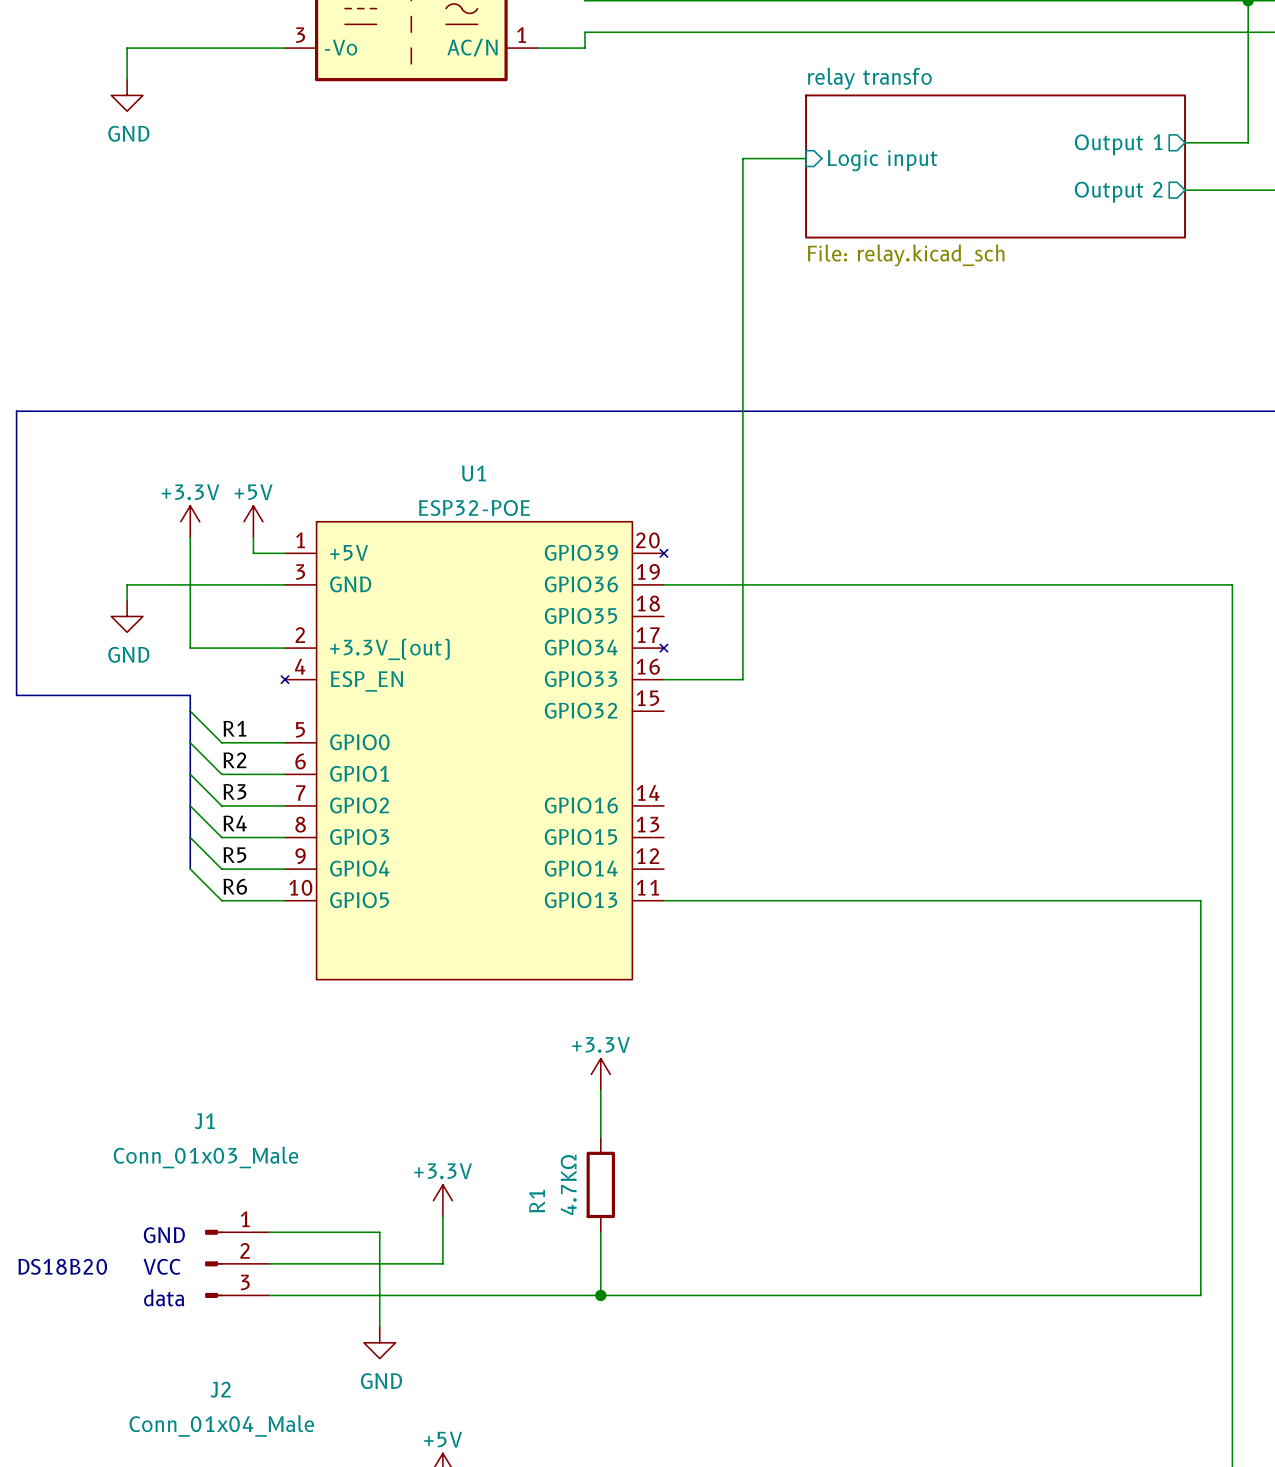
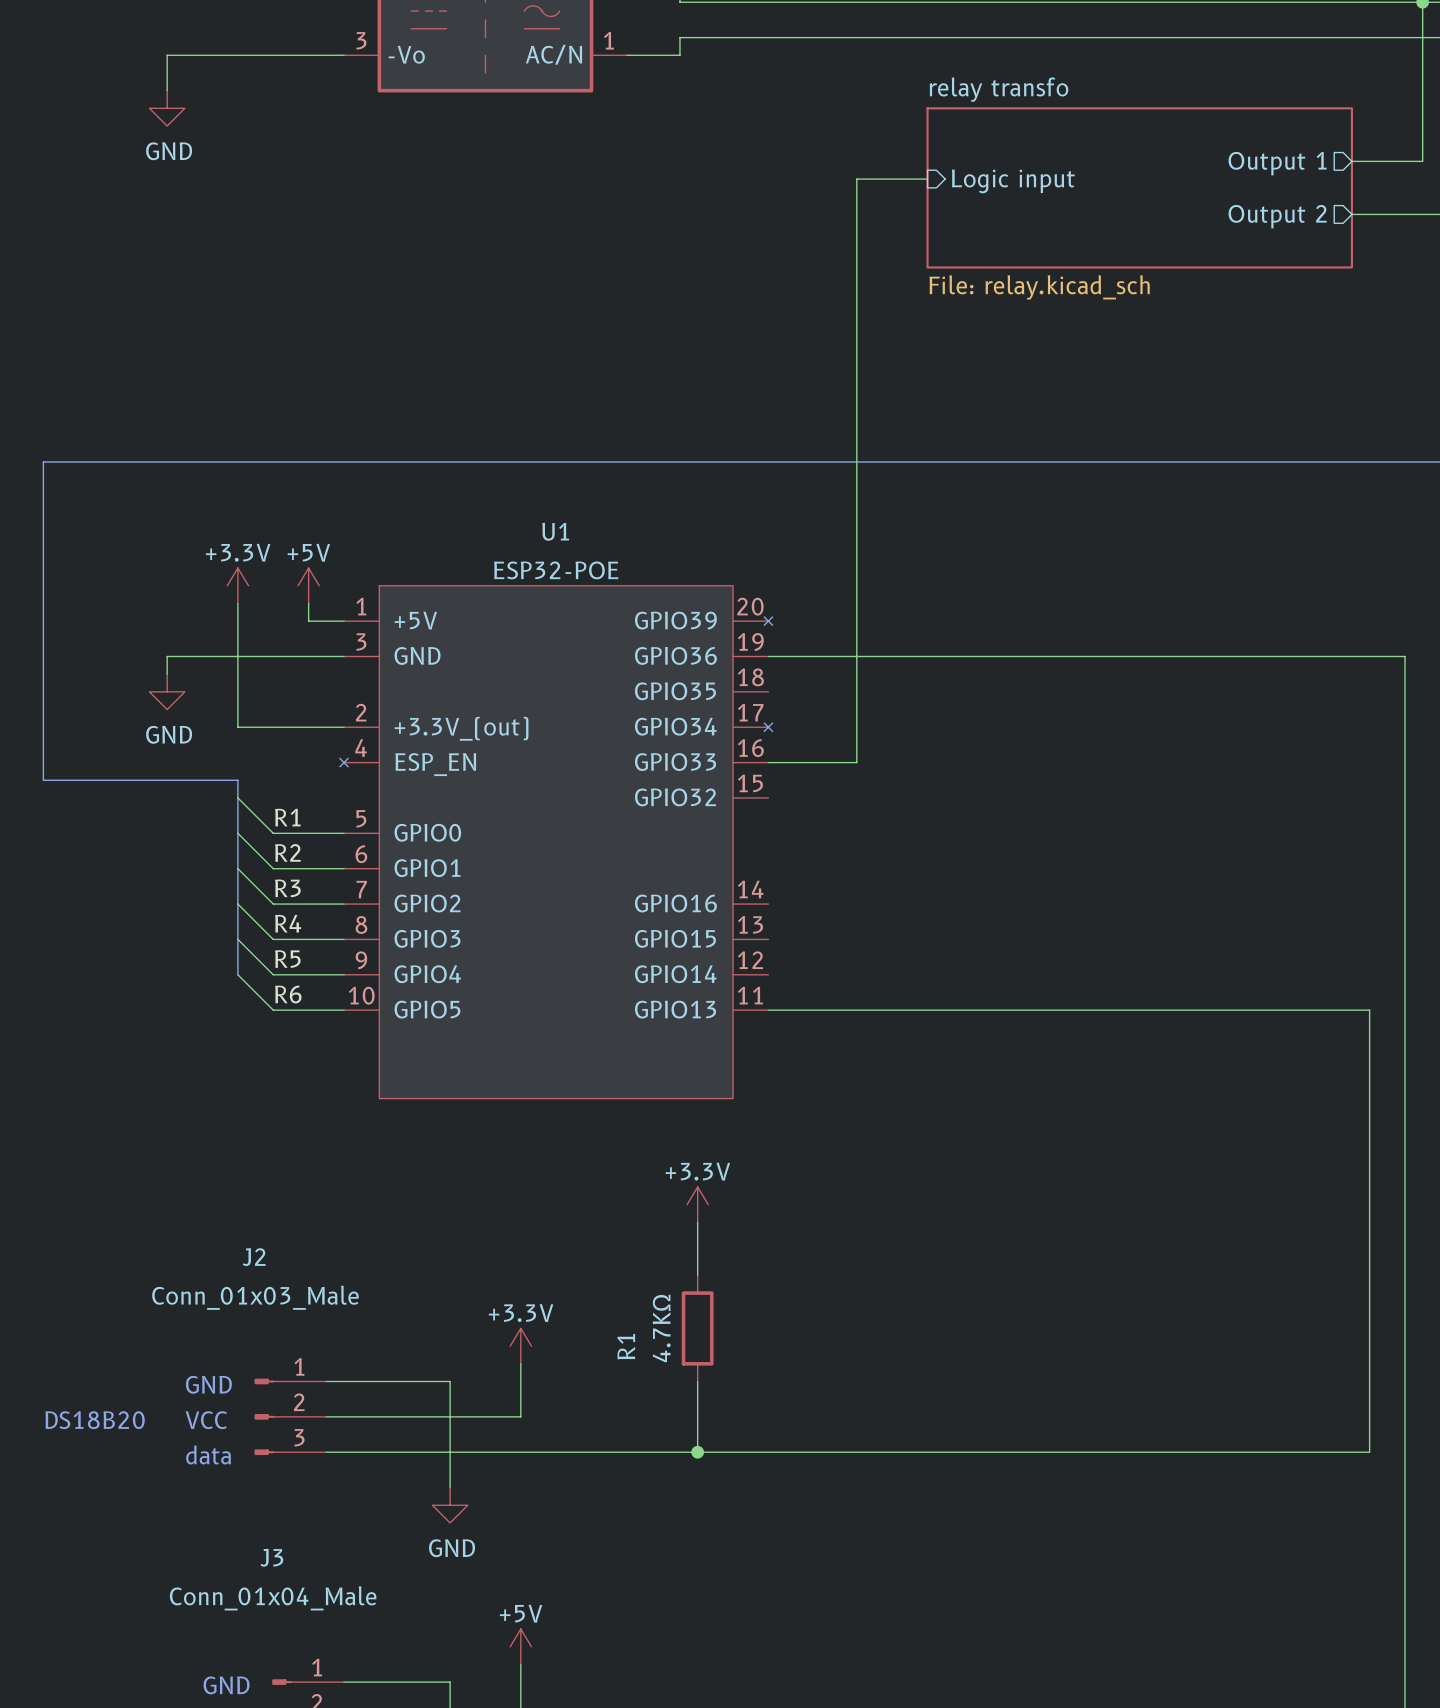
J1 name: J1 (204, 1121) -> J2 (254, 1257)
J2 name: J2 (220, 1389) -> J3 (271, 1557)

